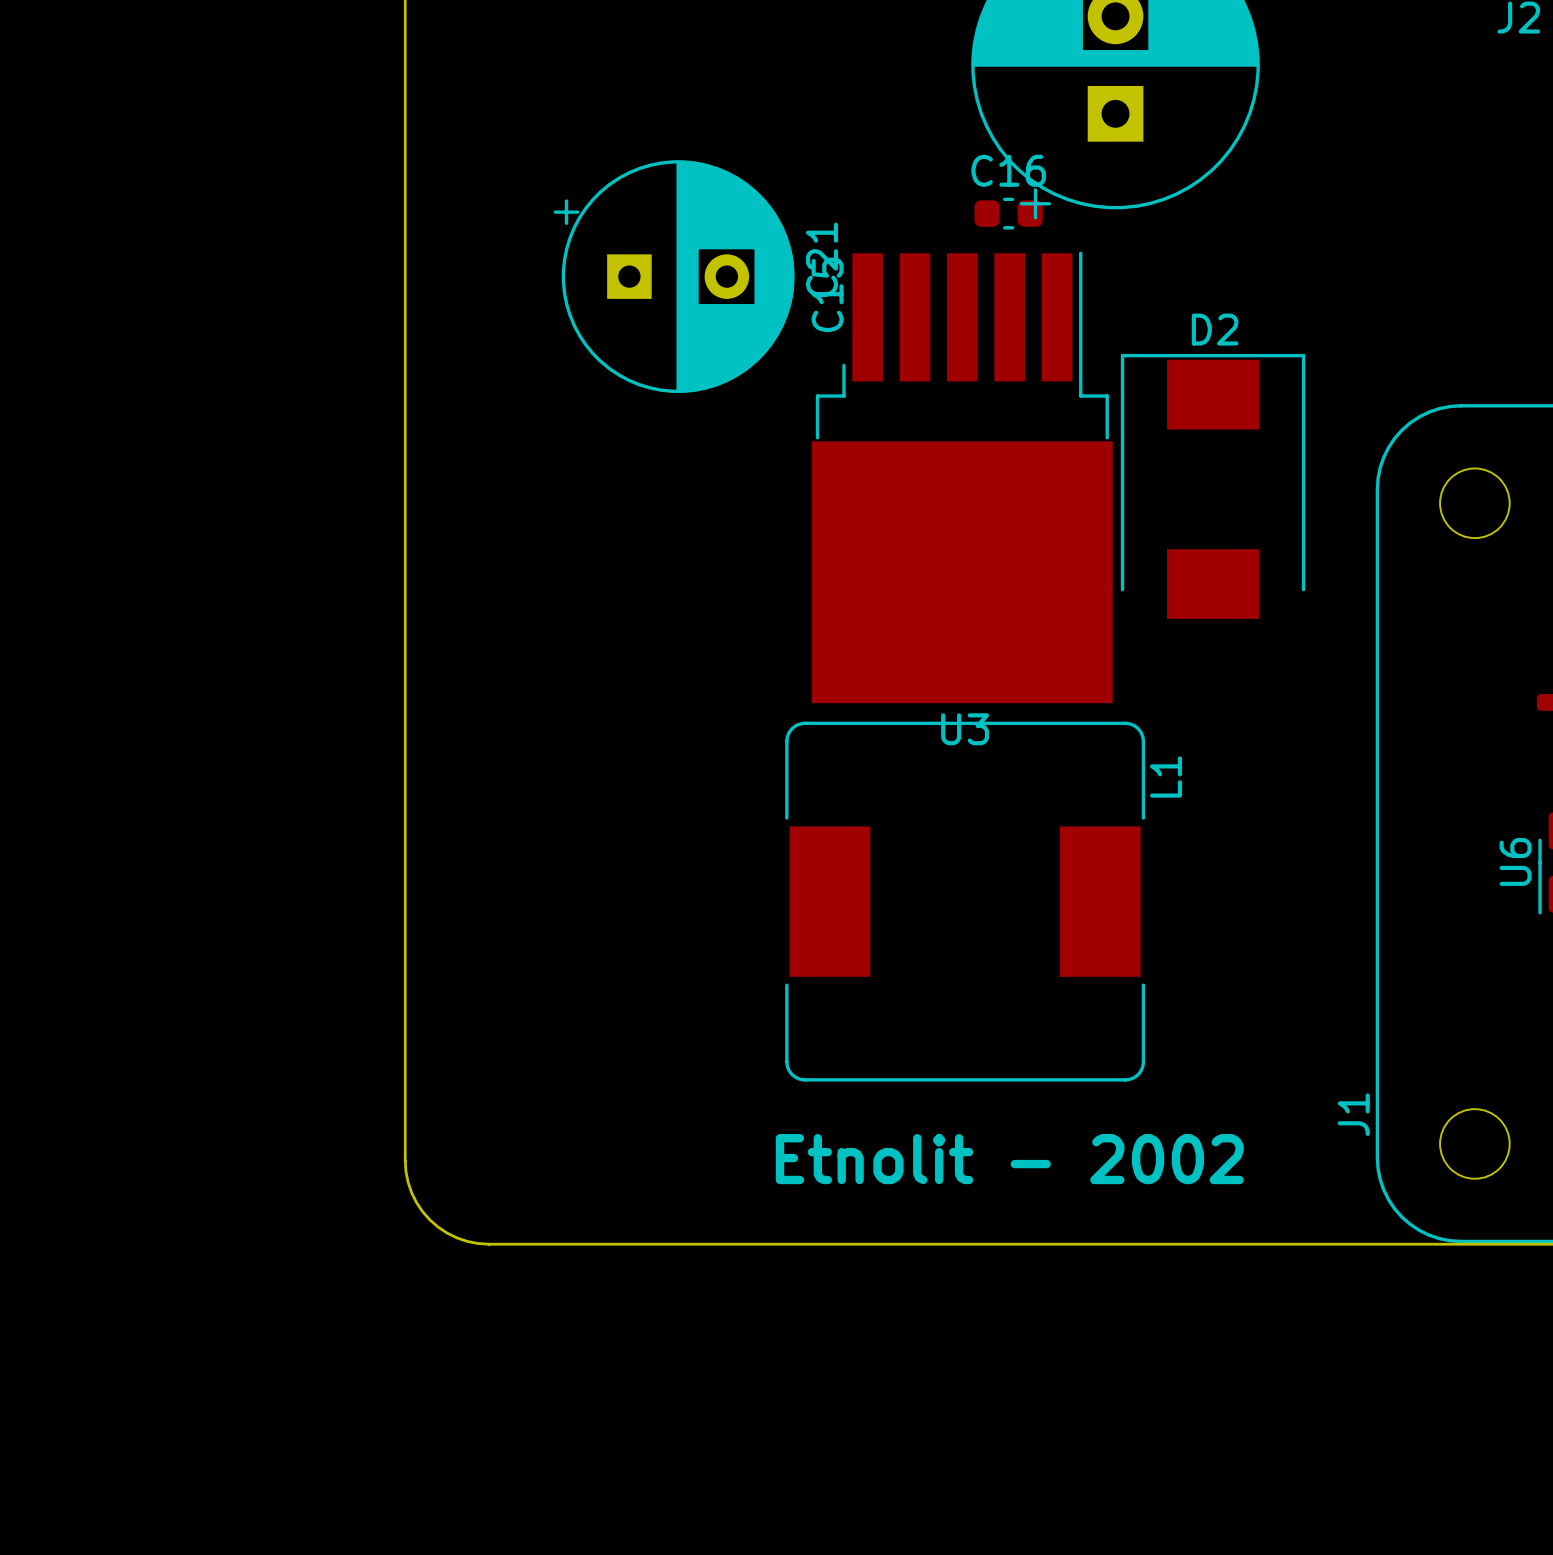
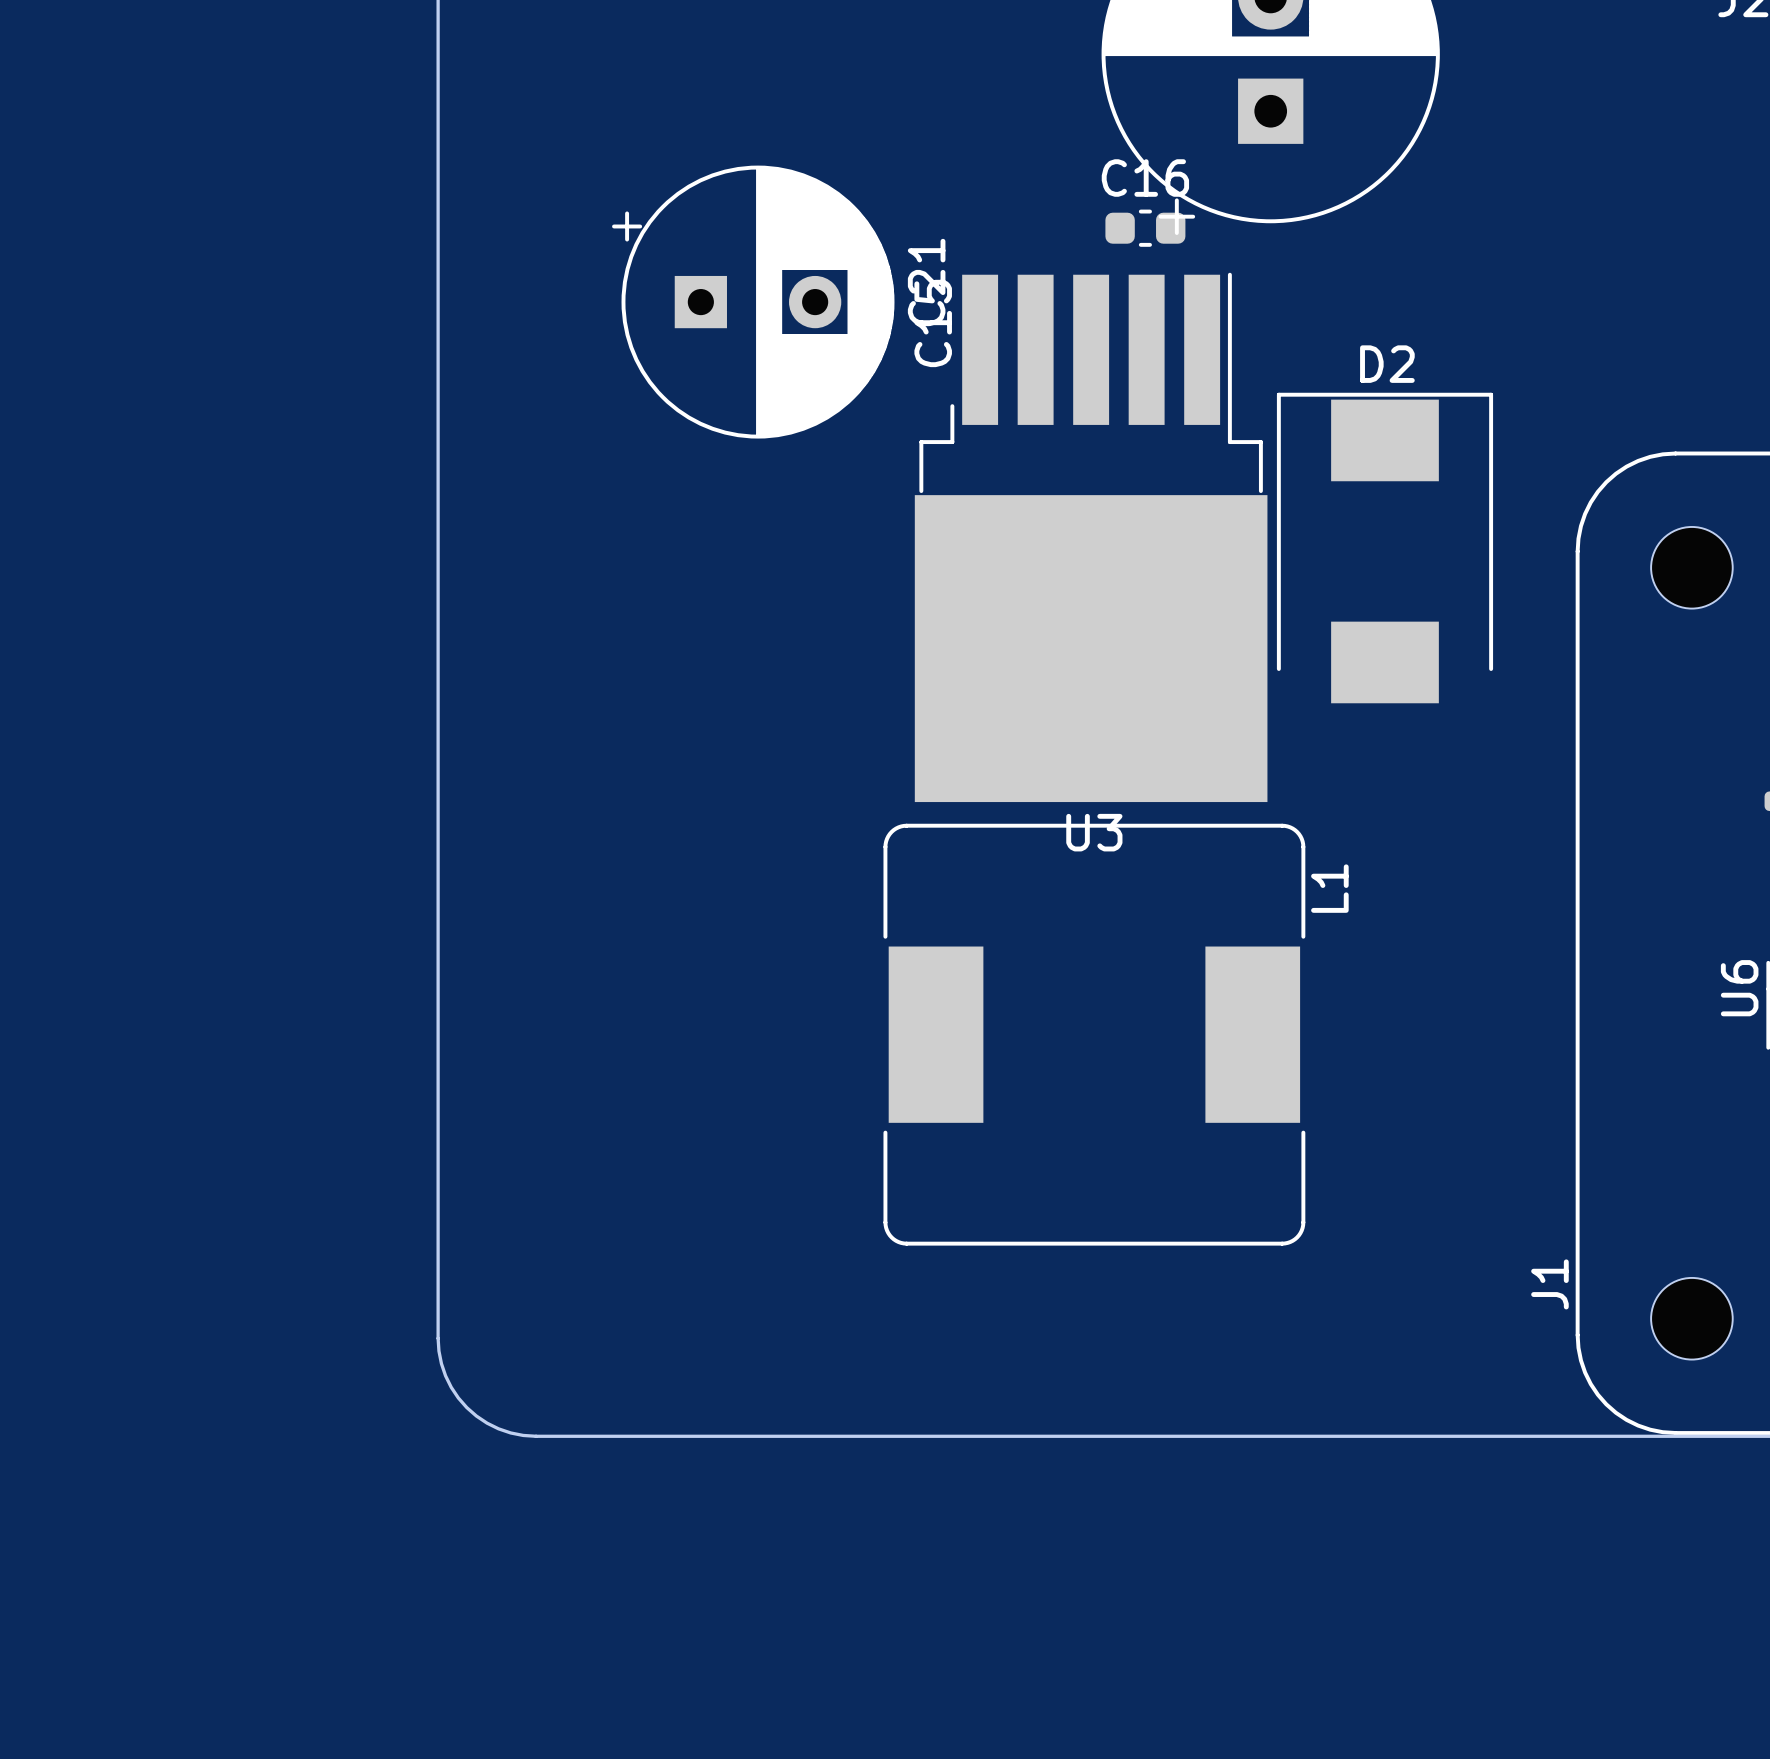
text: Etnolit - 2002 (1009, 1159) -> none

